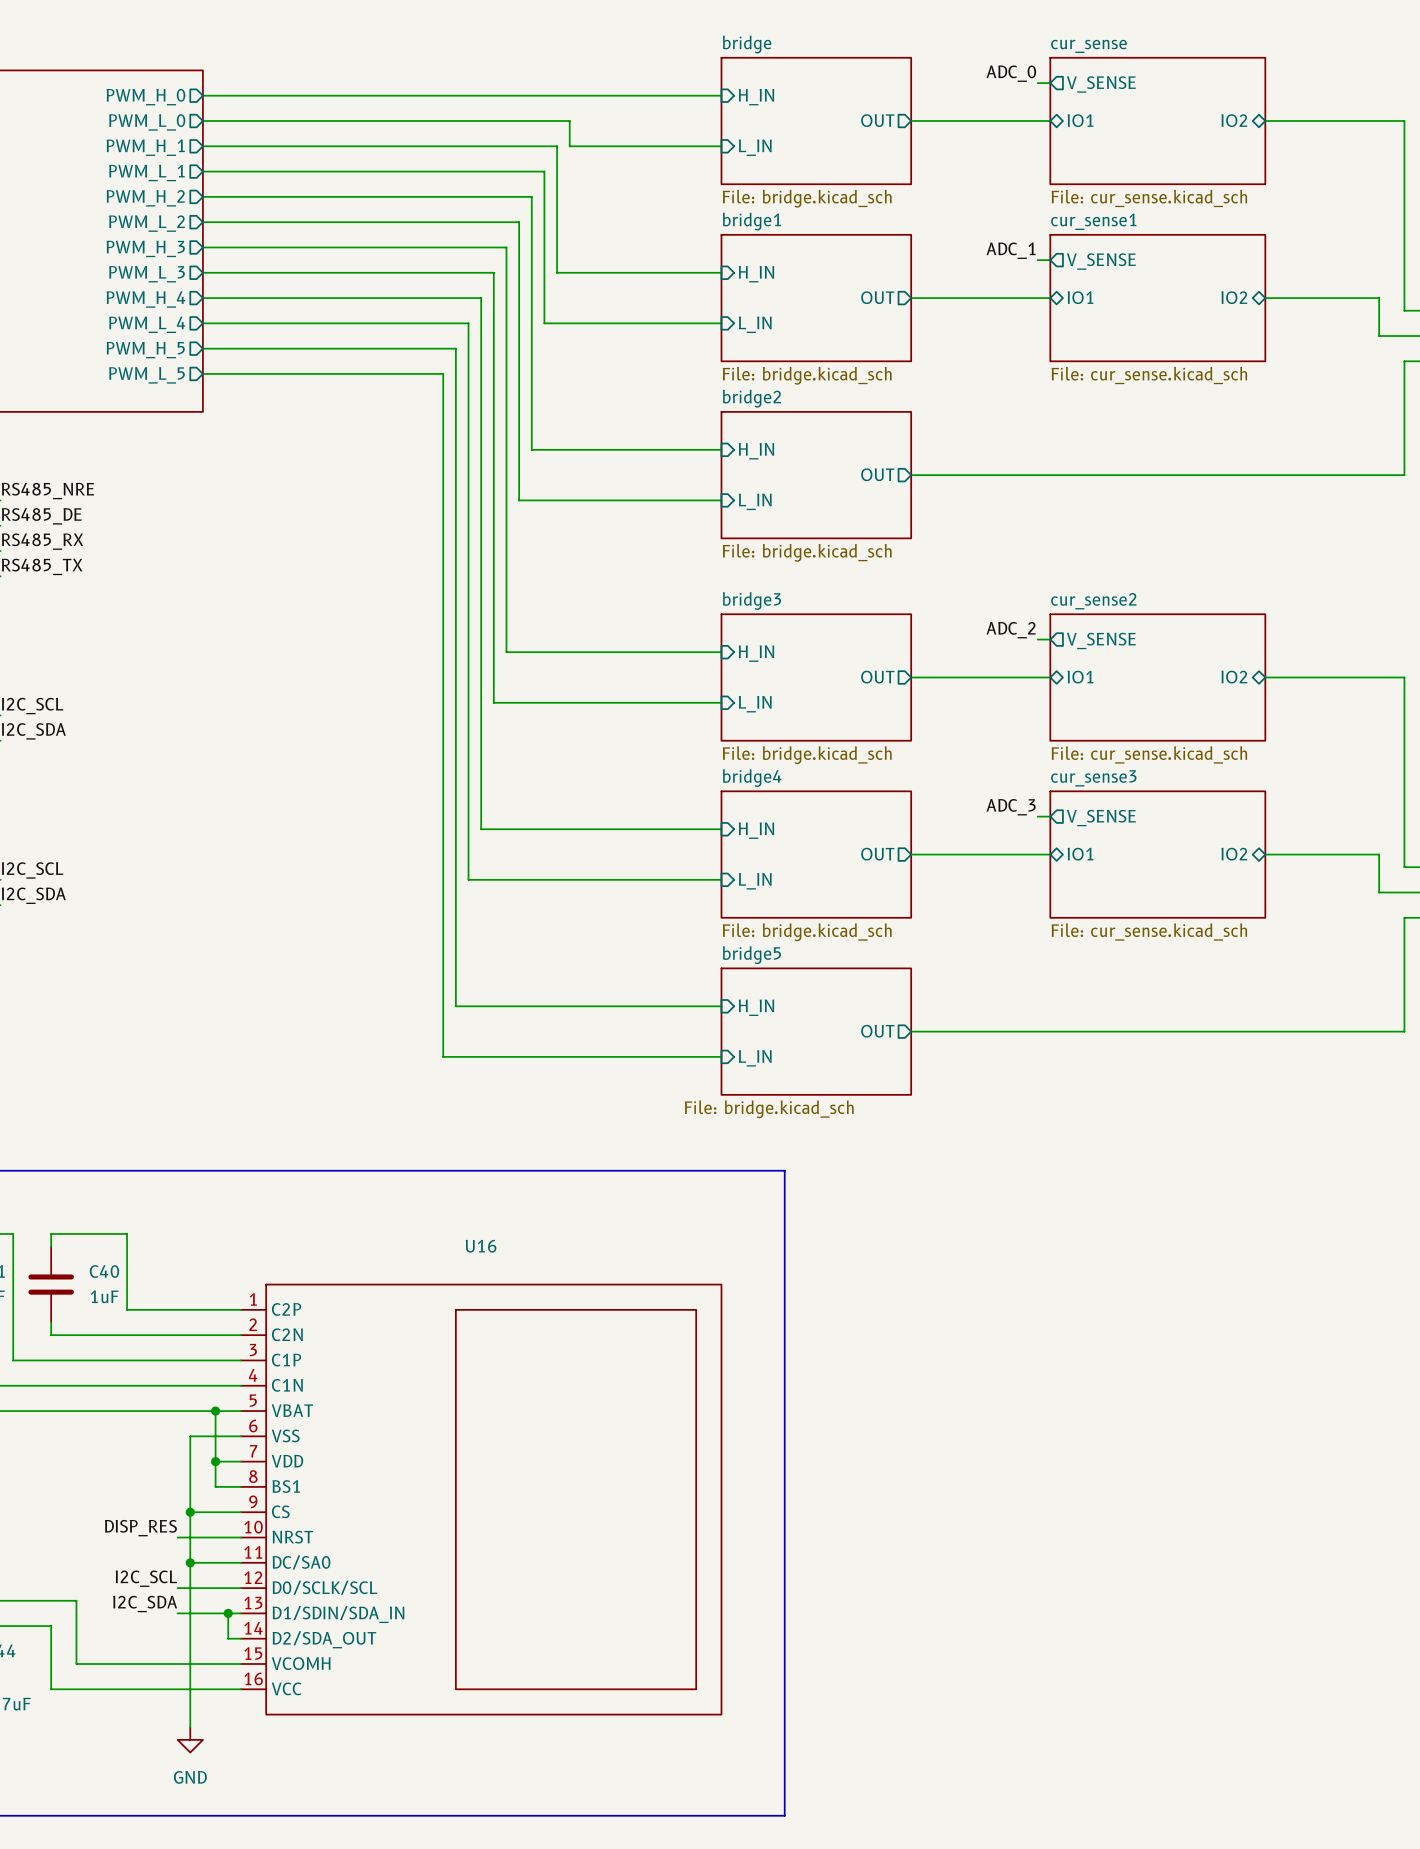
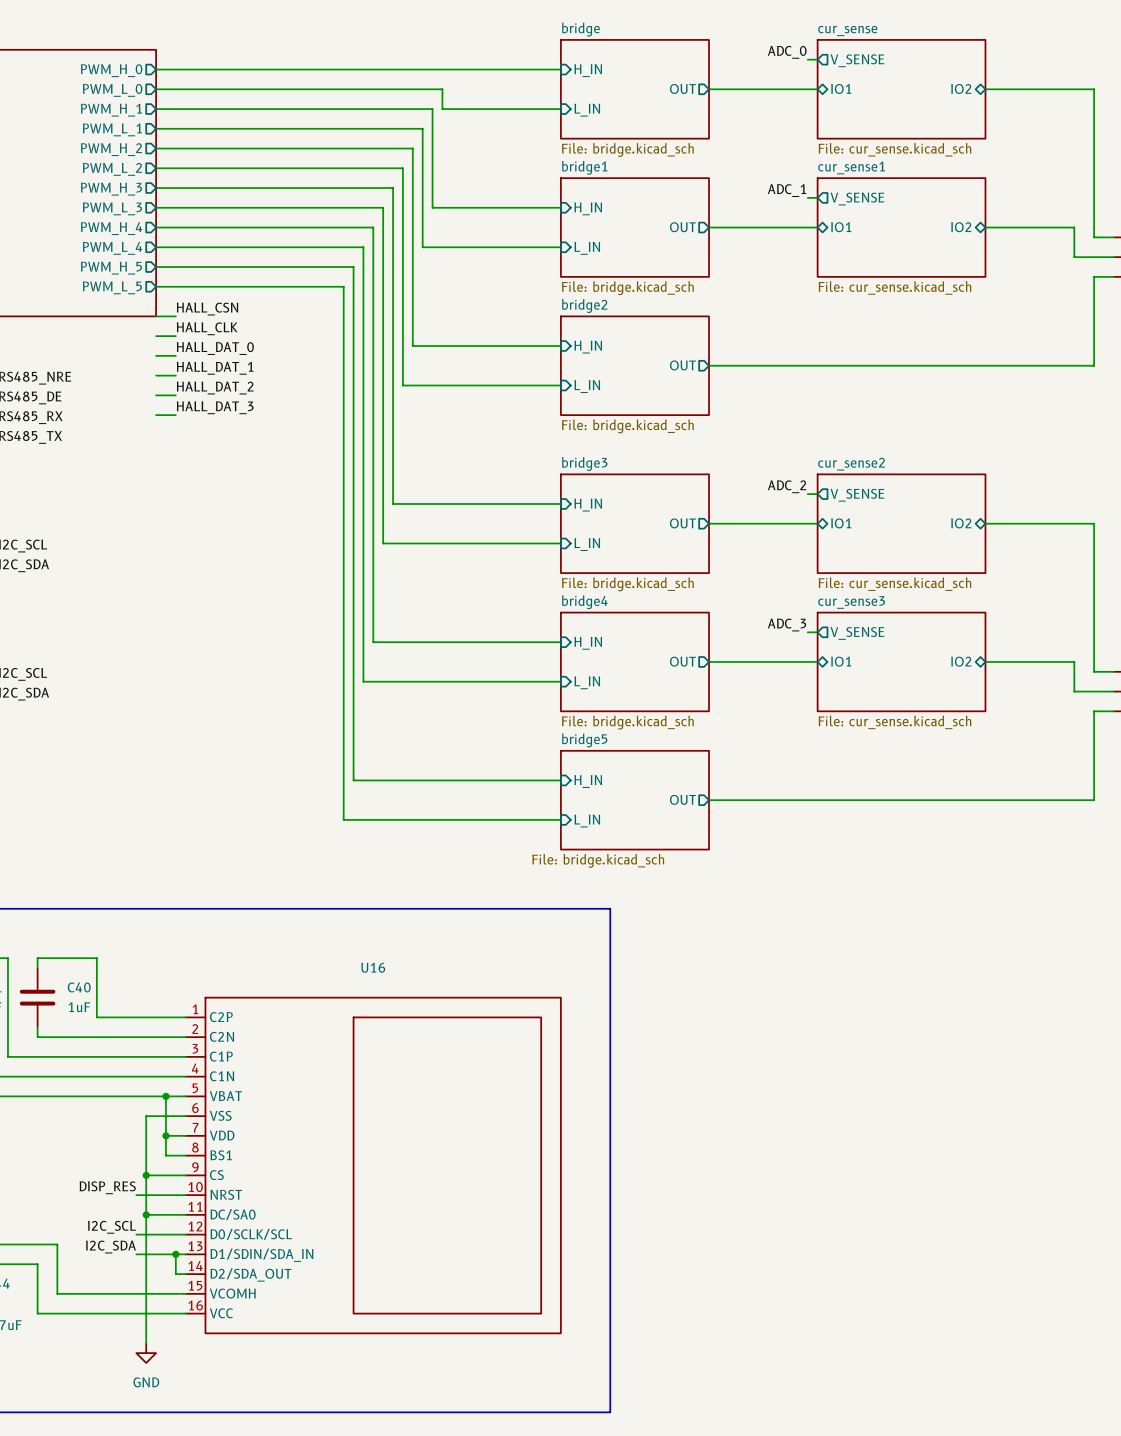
label: none -> HALL_CSN (207, 309)
wire: none -> (156, 316) (175, 316)
label: none -> HALL_CLK (207, 328)
wire: none -> (156, 336) (175, 336)
label: none -> HALL_DAT_0 (215, 348)
wire: none -> (156, 355) (175, 355)
label: none -> HALL_DAT_1 (215, 368)
wire: none -> (156, 375) (175, 375)
label: none -> HALL_DAT_2 (215, 388)
wire: none -> (156, 395) (175, 395)
label: none -> HALL_DAT_3 (215, 407)
wire: none -> (156, 415) (175, 415)

